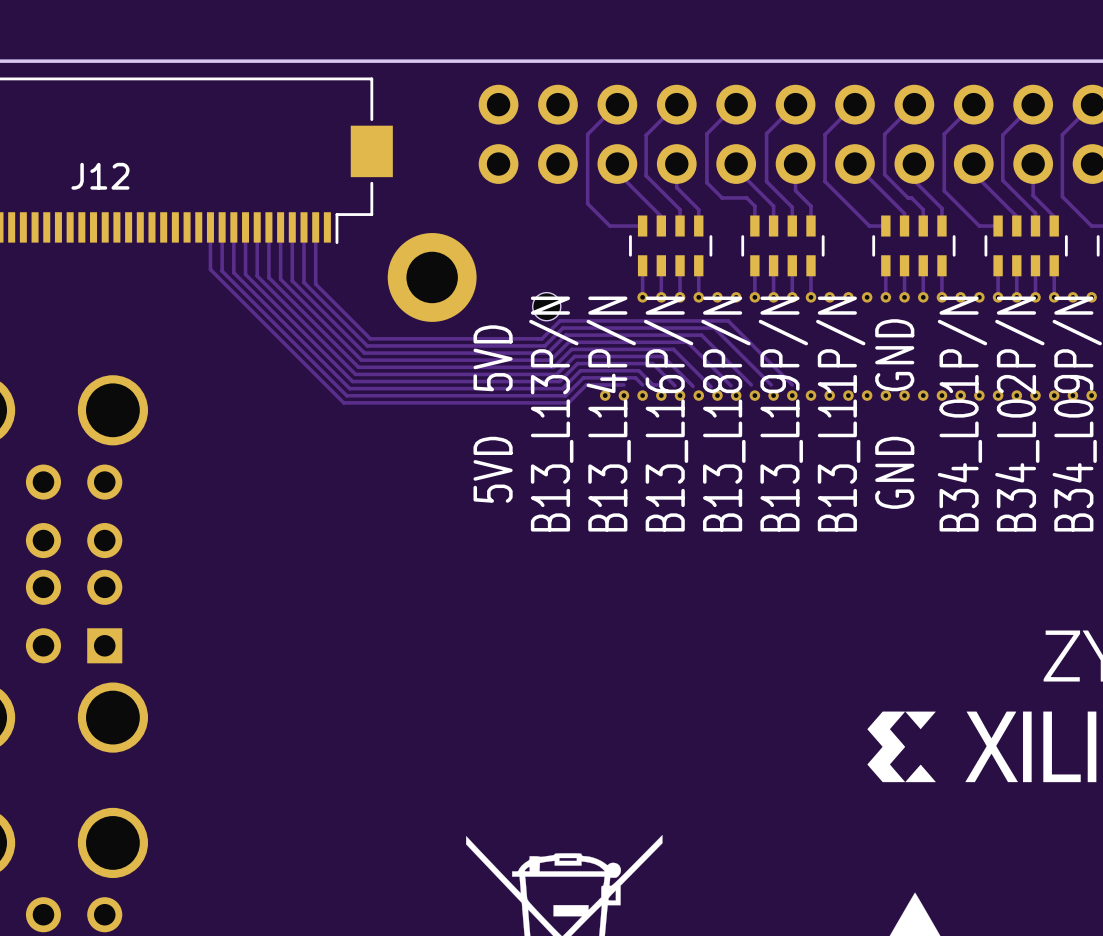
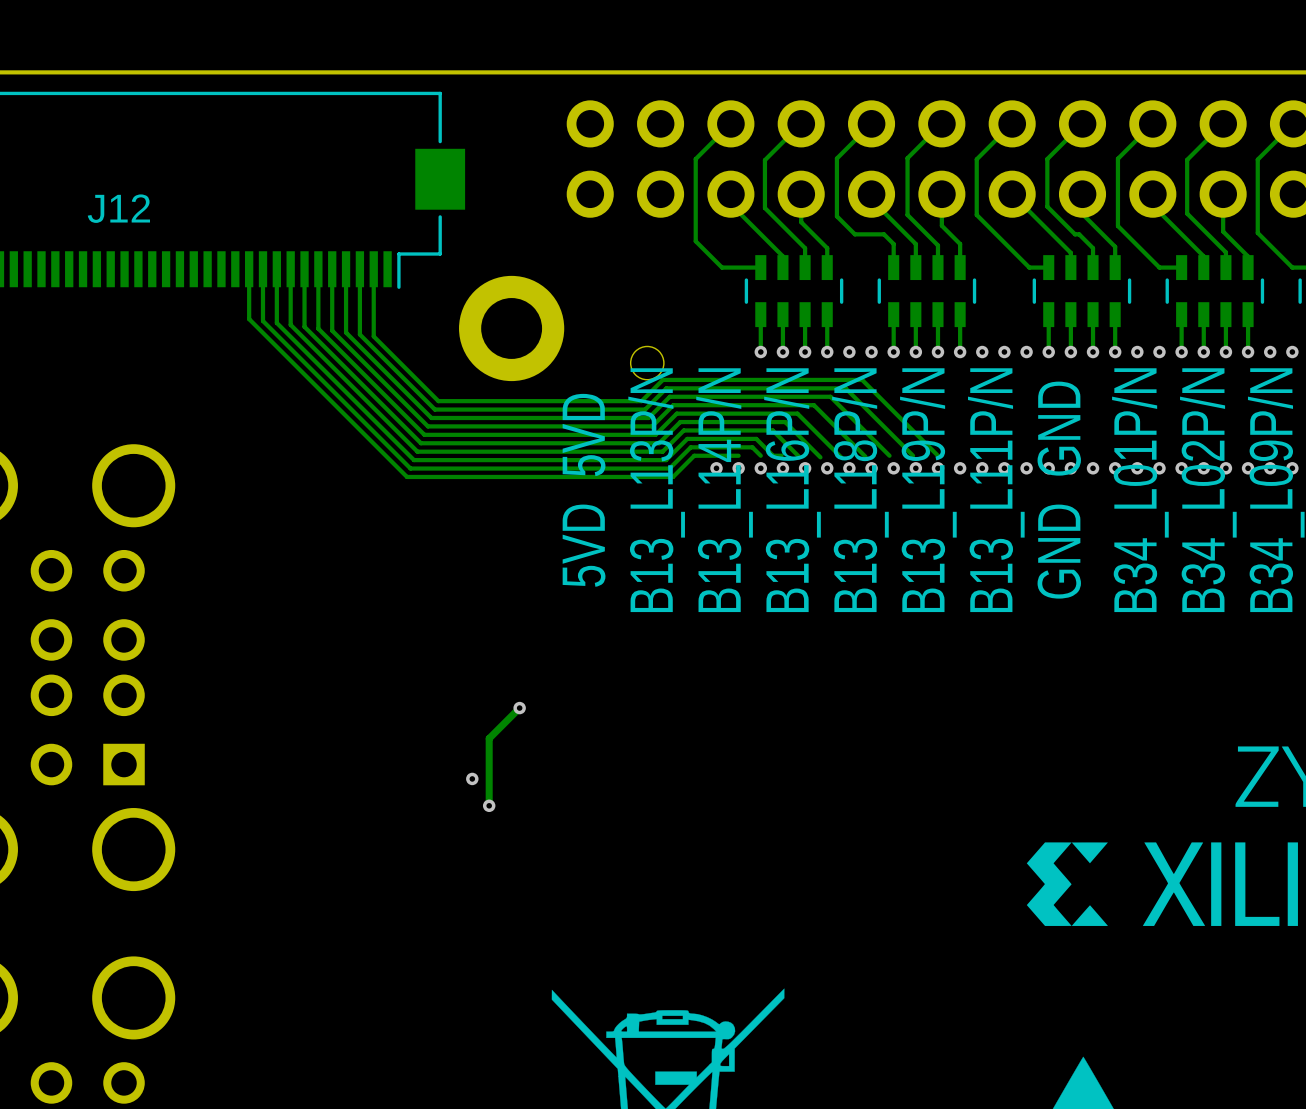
track: none -> (519, 708) (489, 738) (489, 805)
via: none -> (519, 708)
via: none -> (472, 778)
via: none -> (489, 805)

